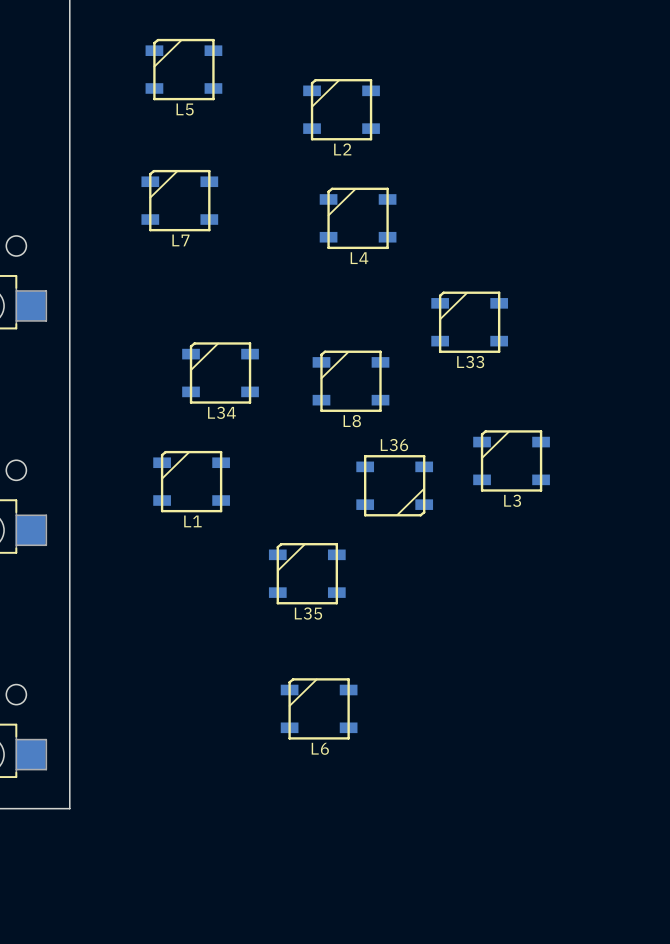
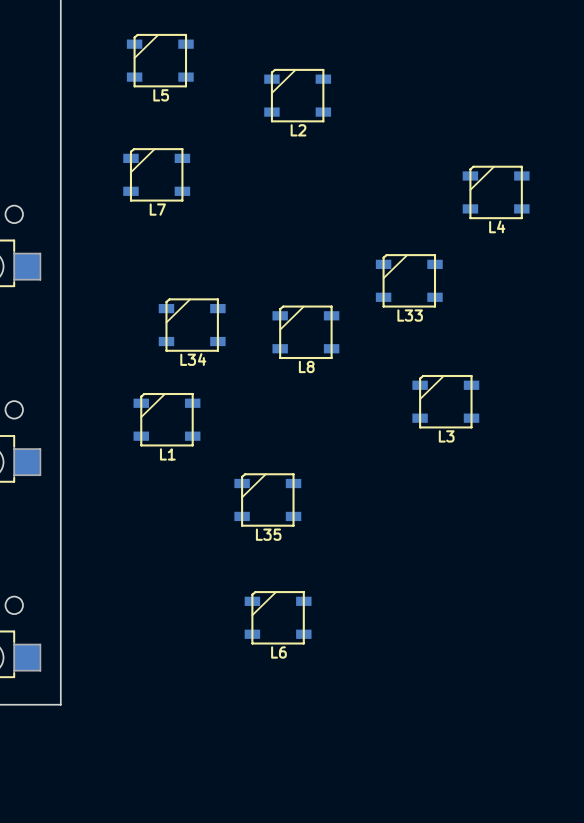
L4 position: (358, 218) -> (496, 192)
L36: (394, 485) -> none

